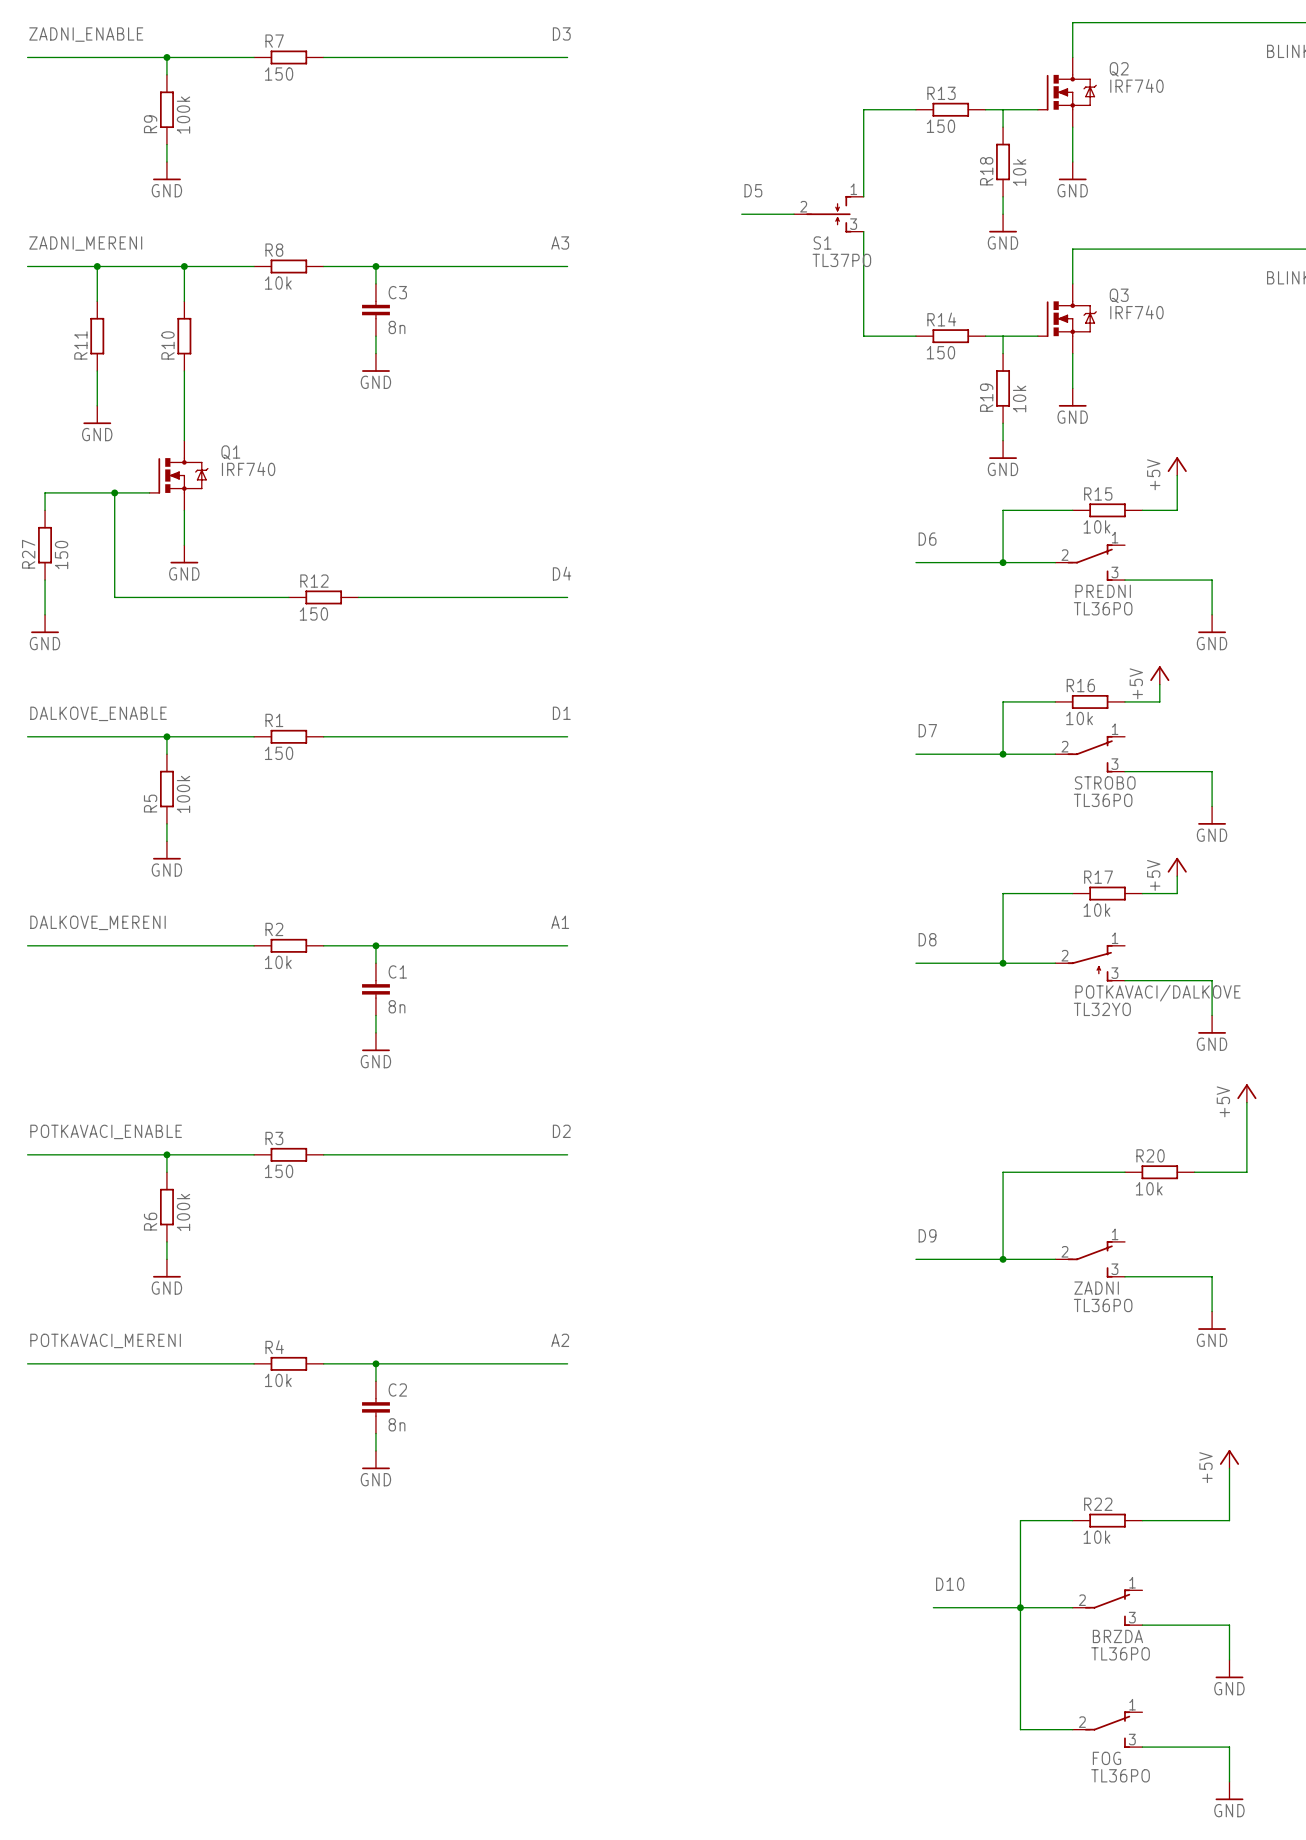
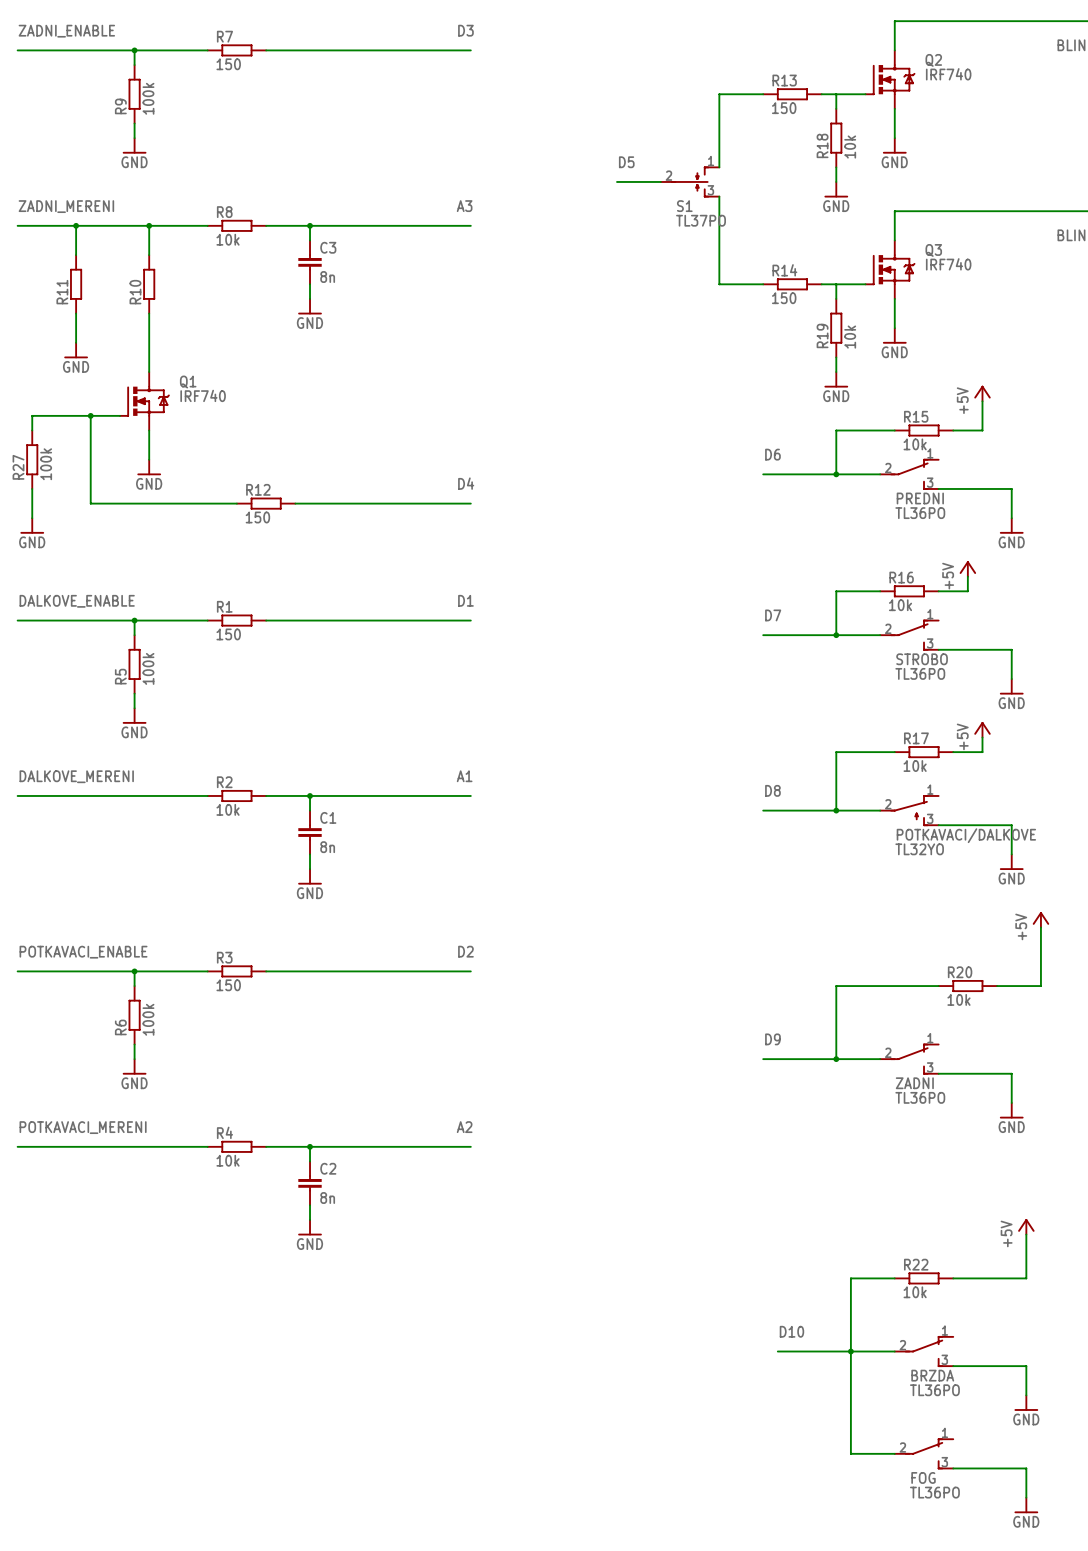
R27 value: 150 (61, 555) -> 100k (46, 464)

